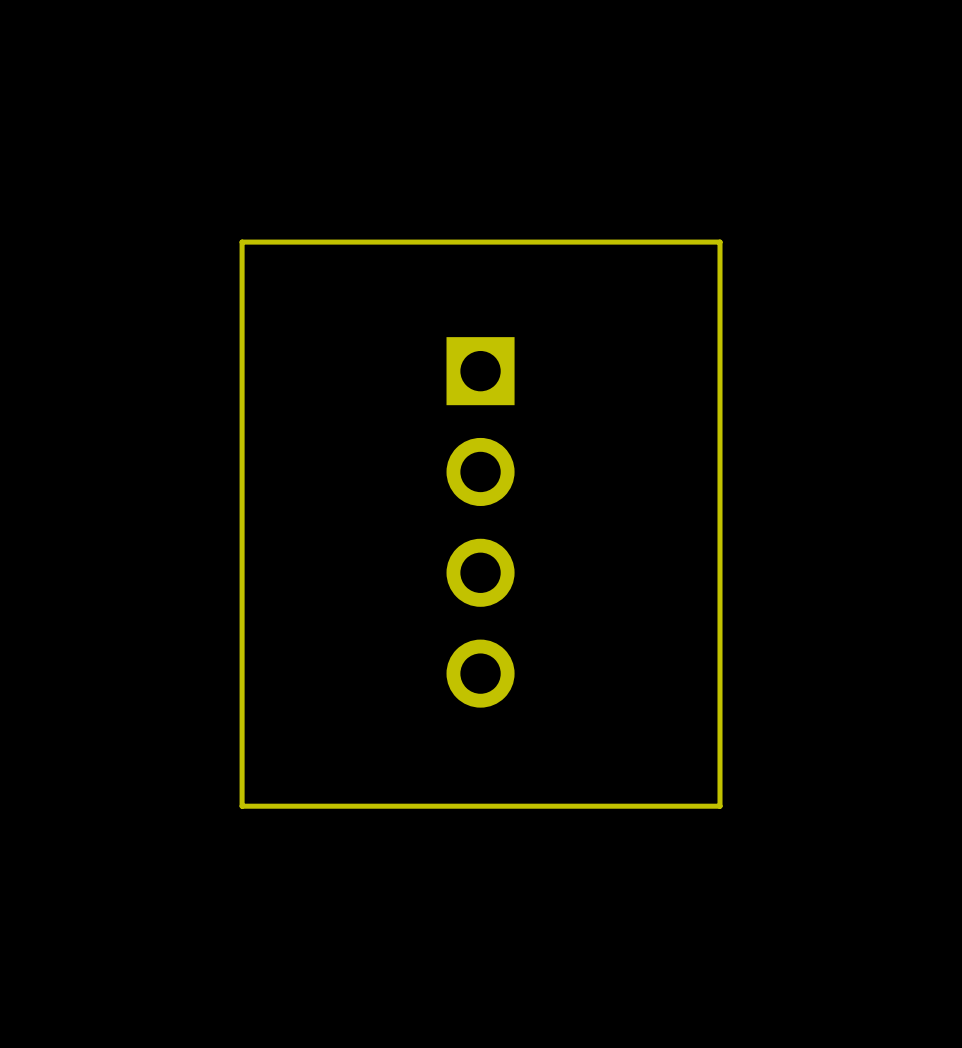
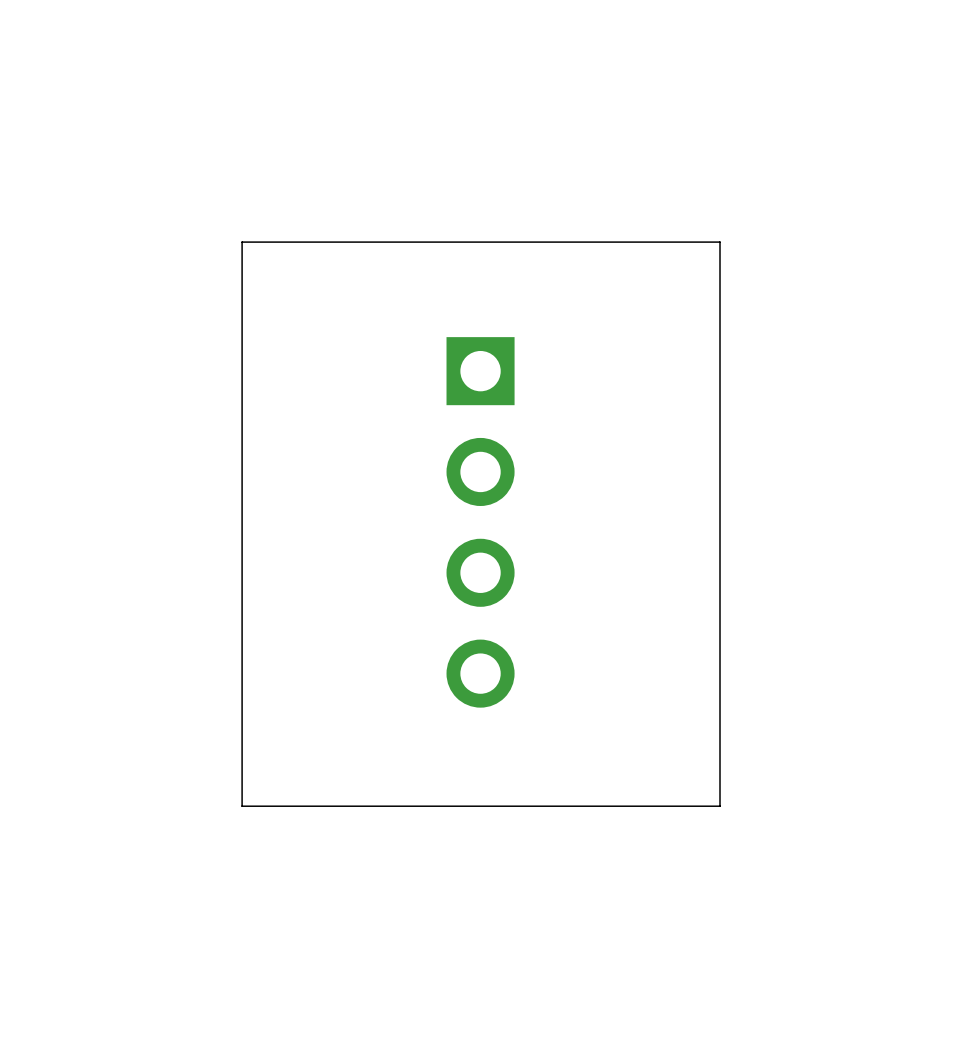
board edge width: thick (242, 242) (720, 242) (720, 806) (242, 806) (242, 242) -> thin (242, 242) (720, 242) (720, 806) (242, 806) (242, 242)

